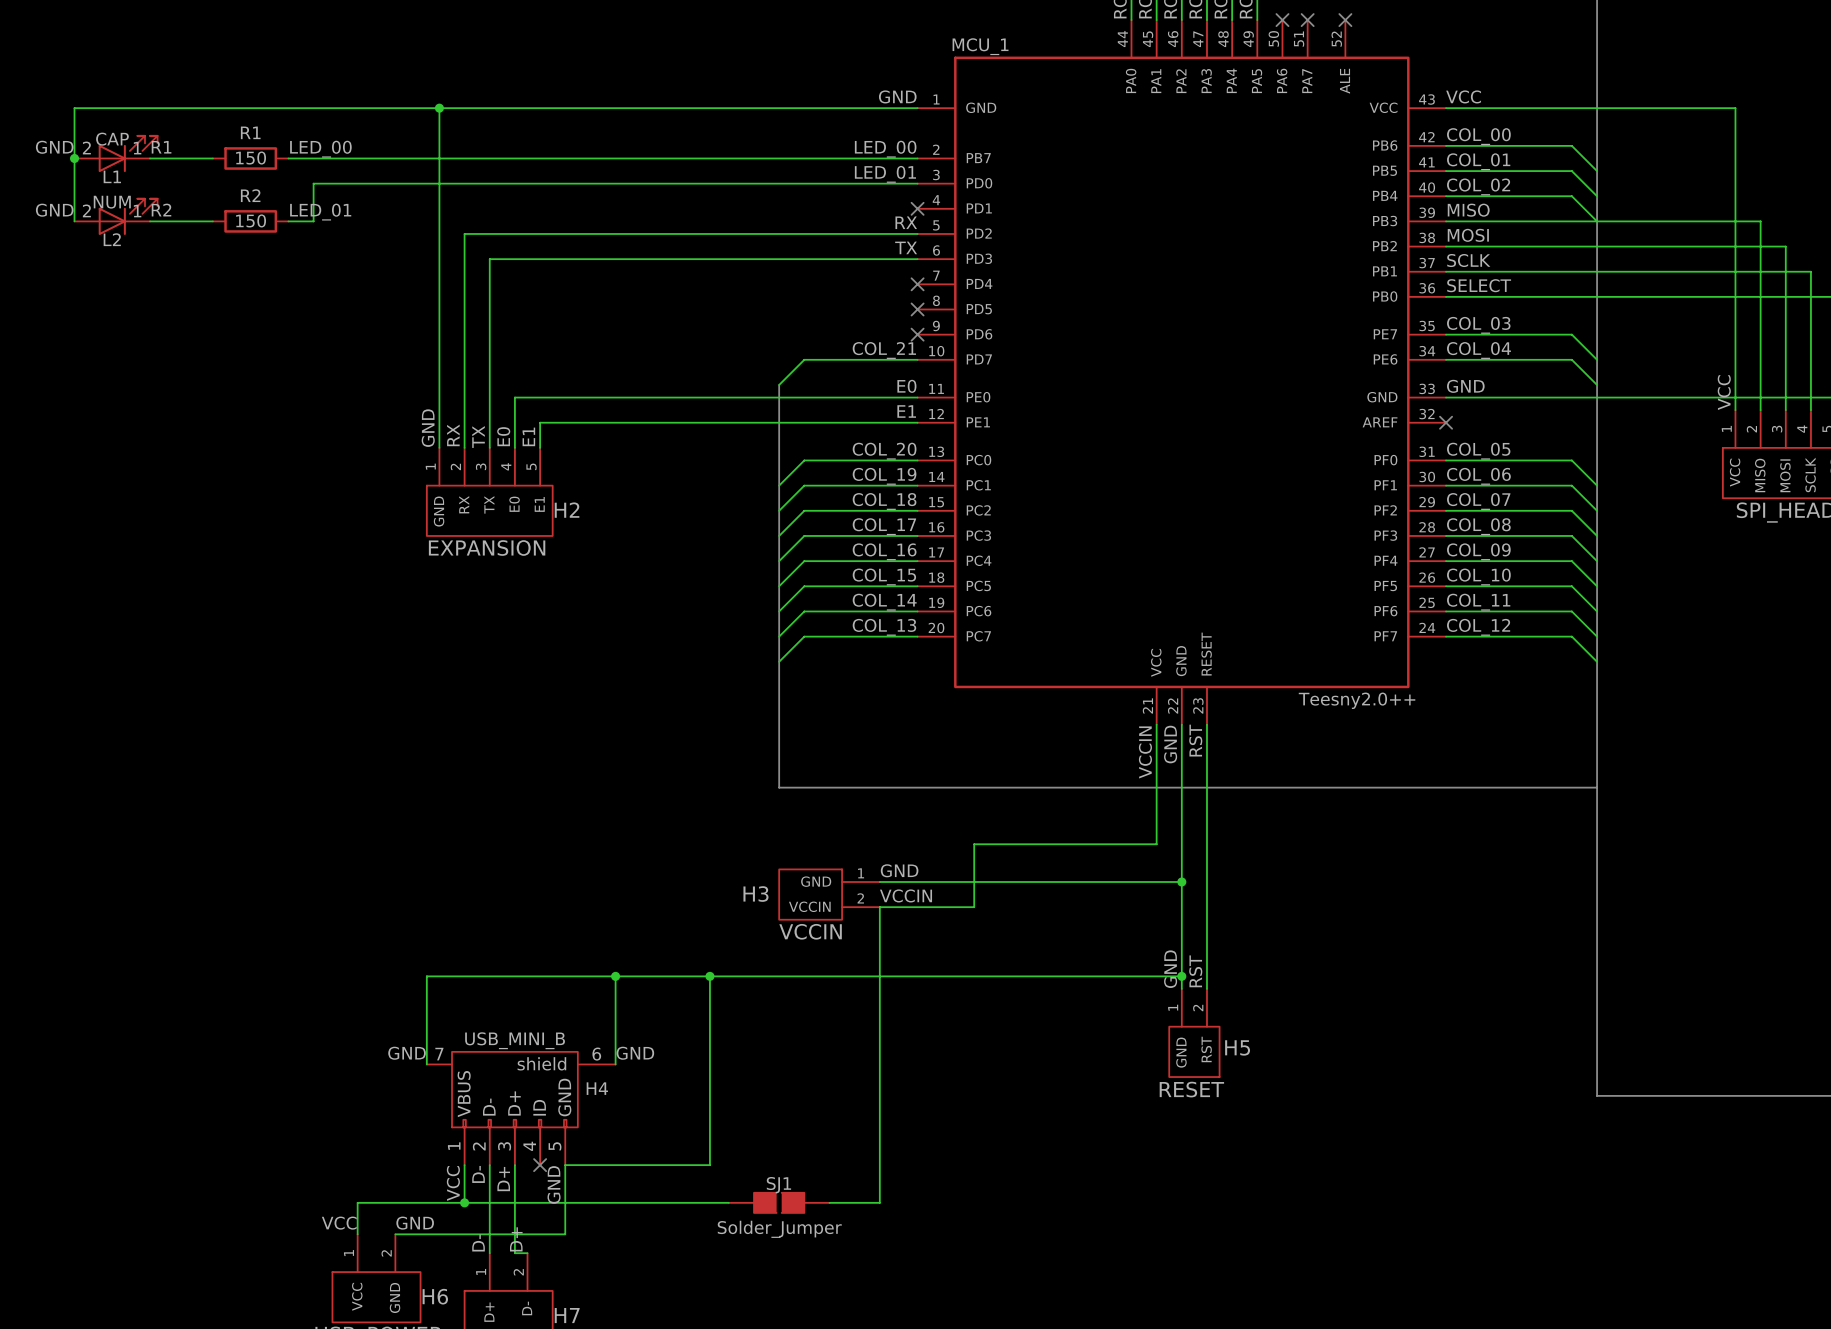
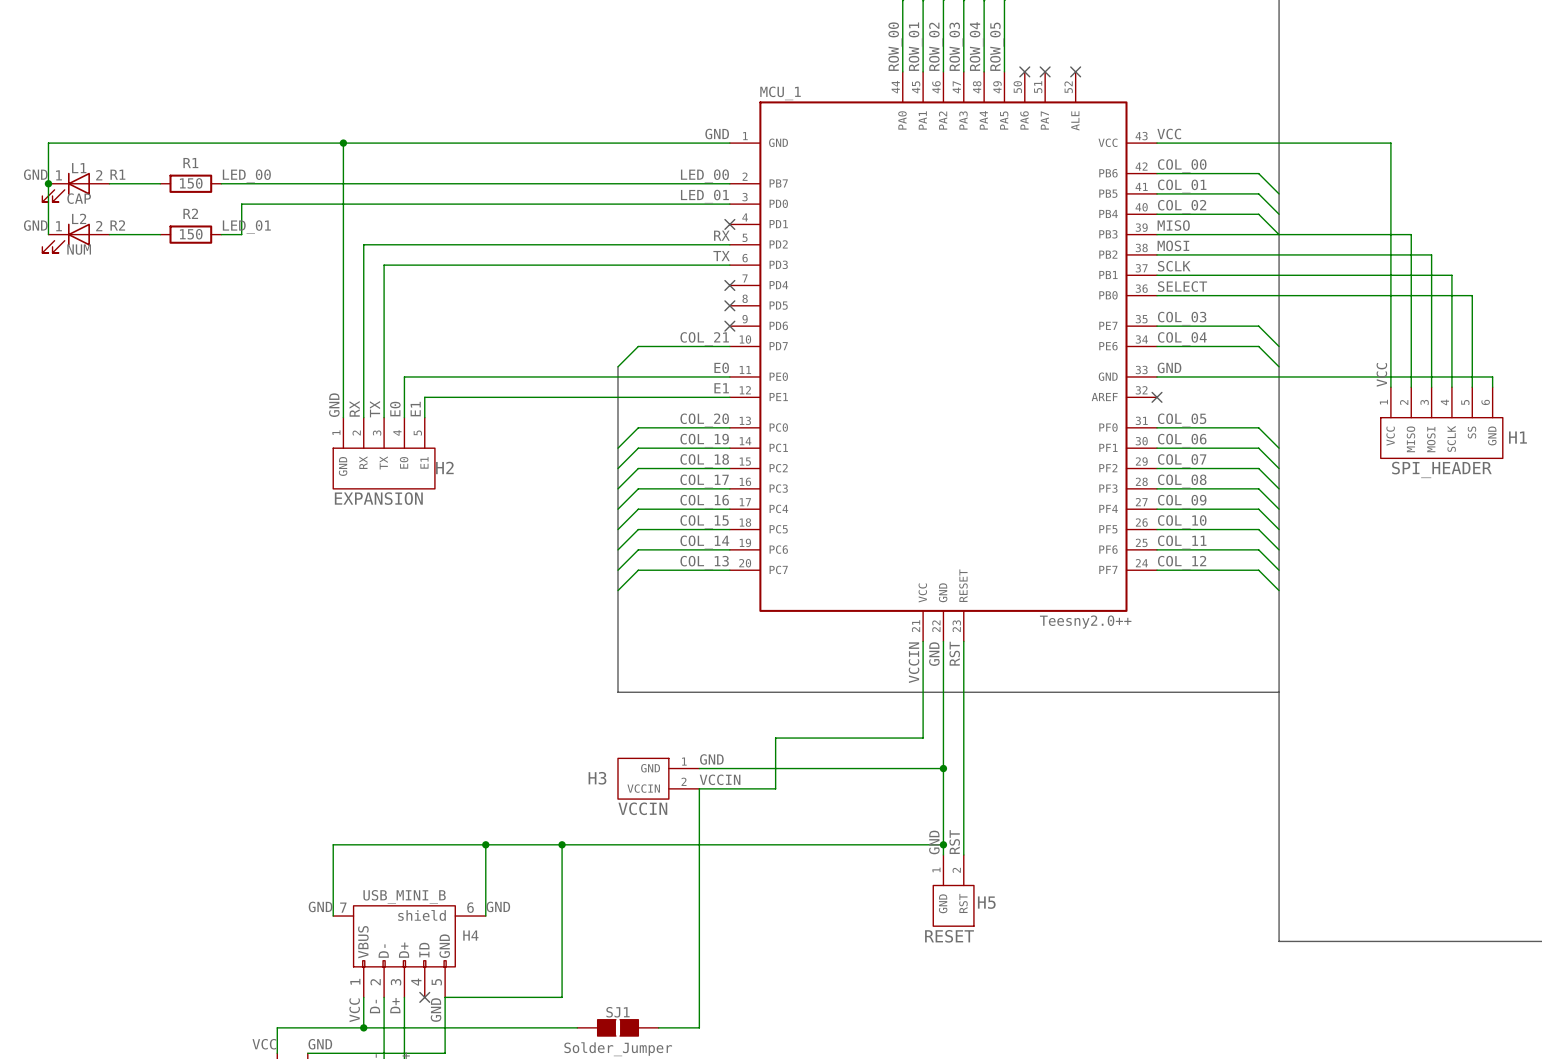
L1 rotation: 0° (128, 153) -> 180° (66, 187)
L2 rotation: 0° (128, 216) -> 180° (66, 238)

